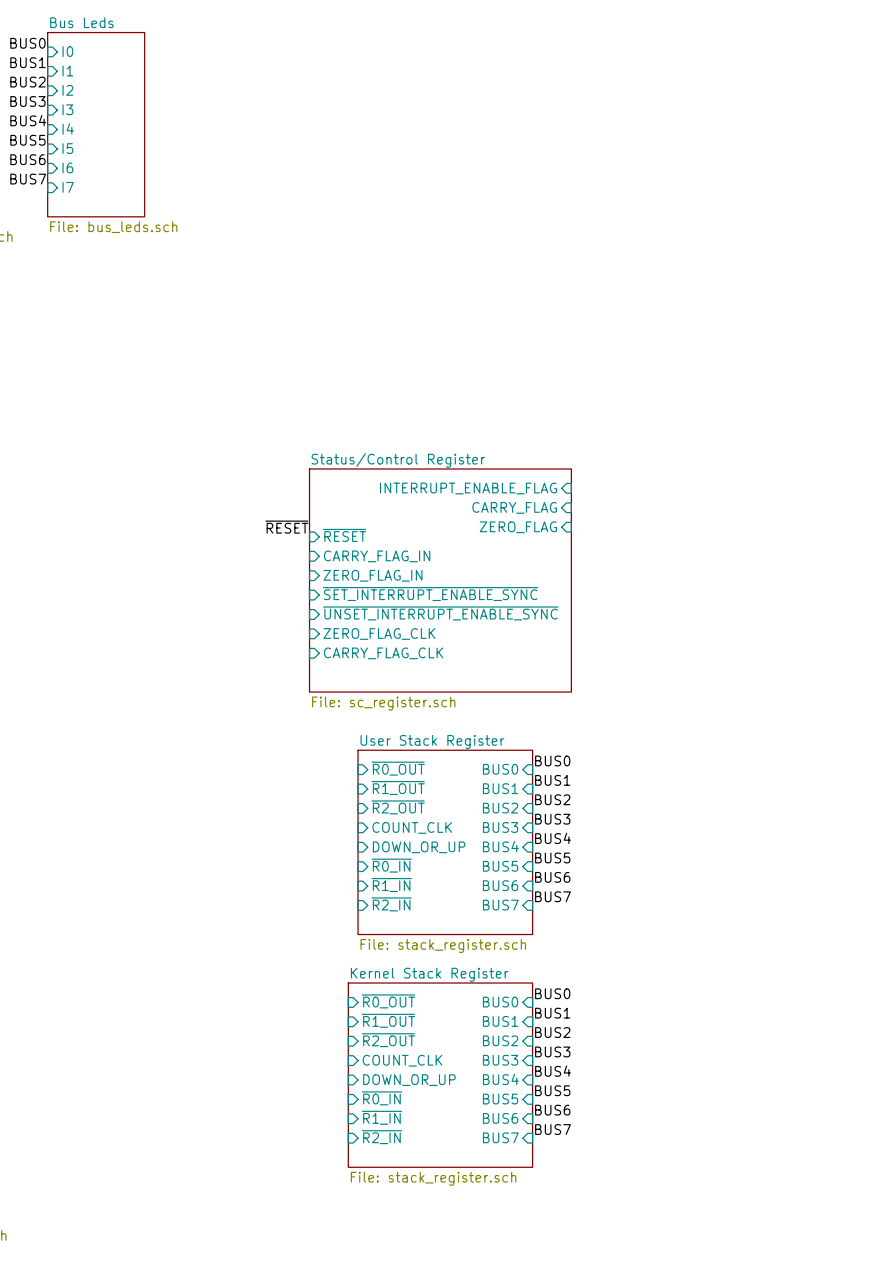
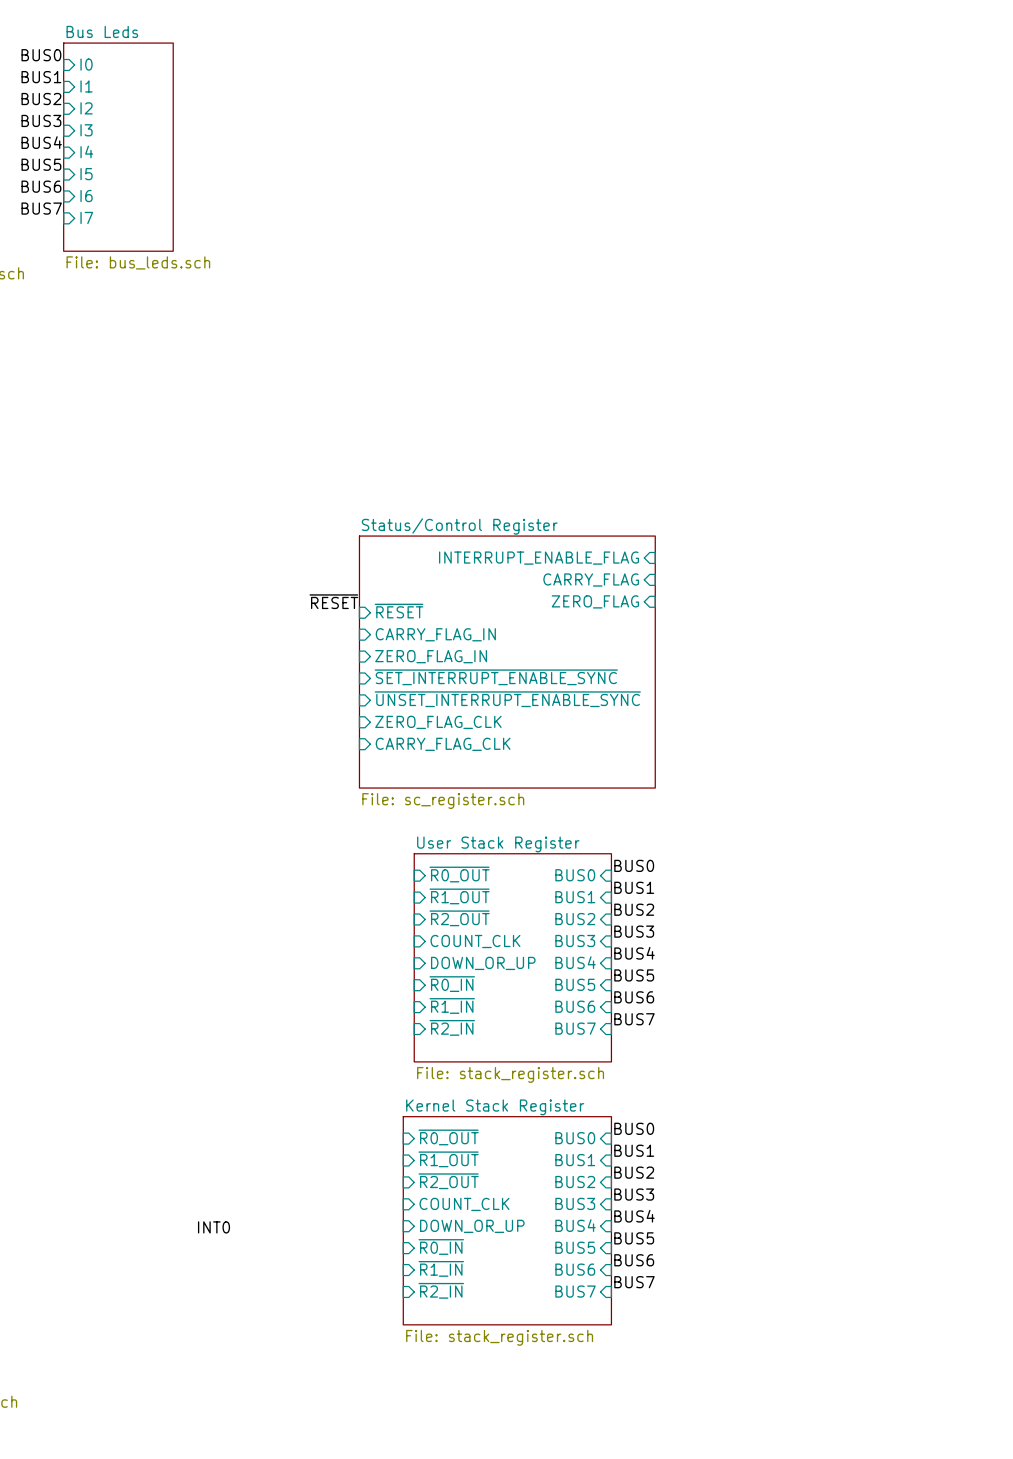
label: none -> INT0 (214, 1227)

